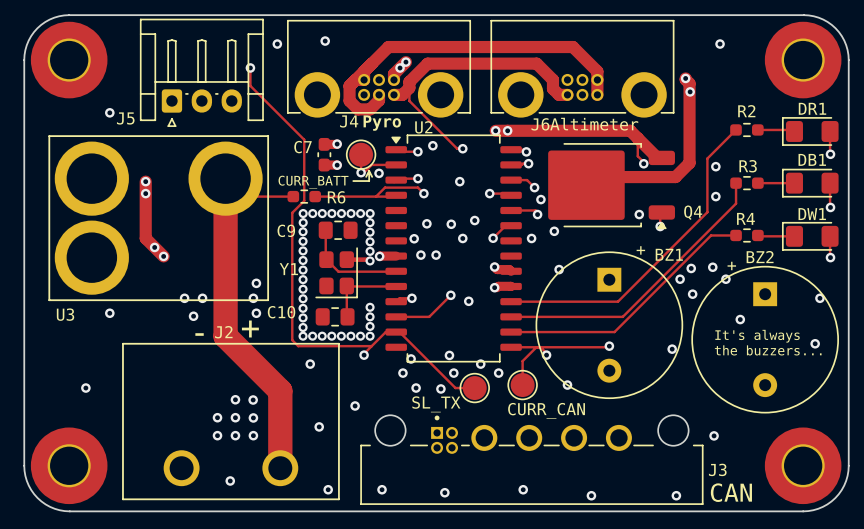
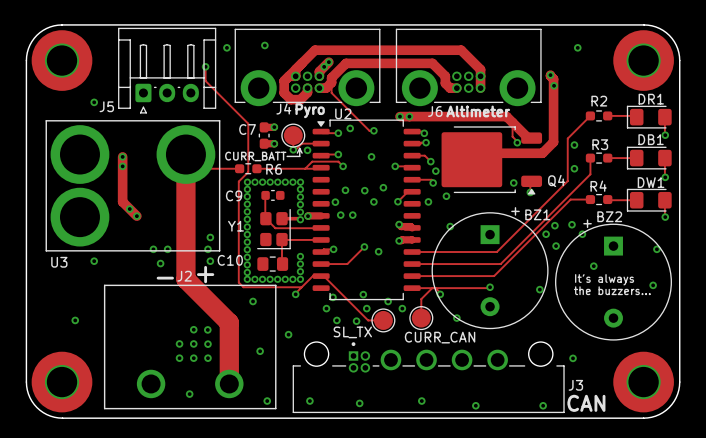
C9 footprint: [318, 220, 358, 240] -> [261, 190, 285, 201]

